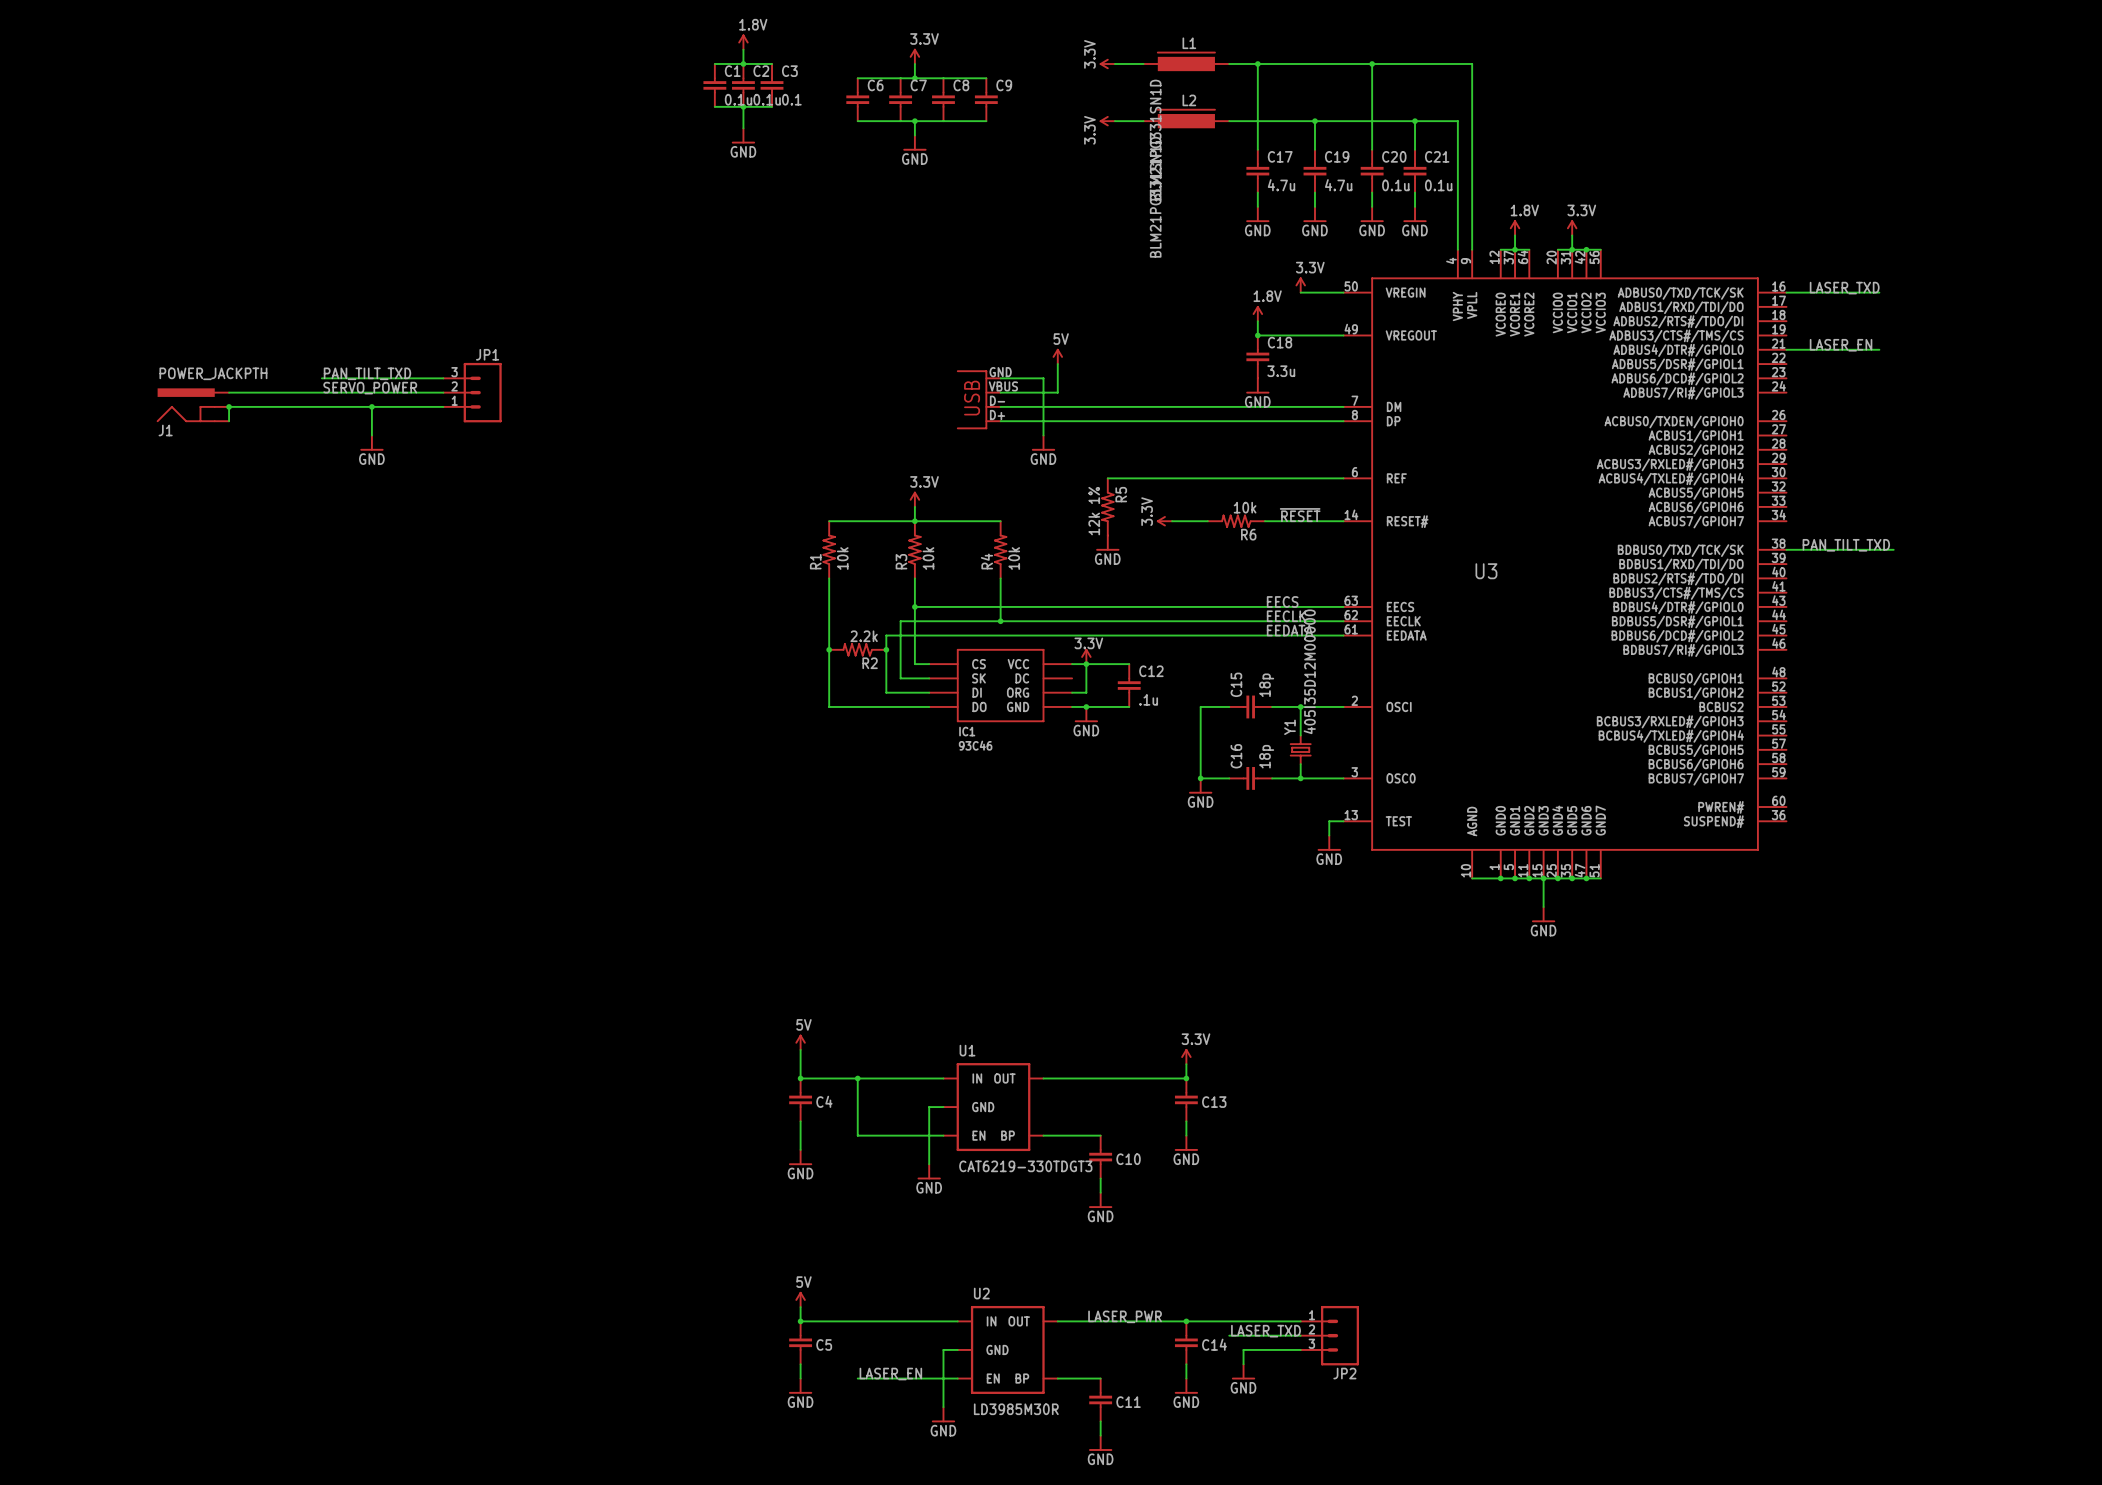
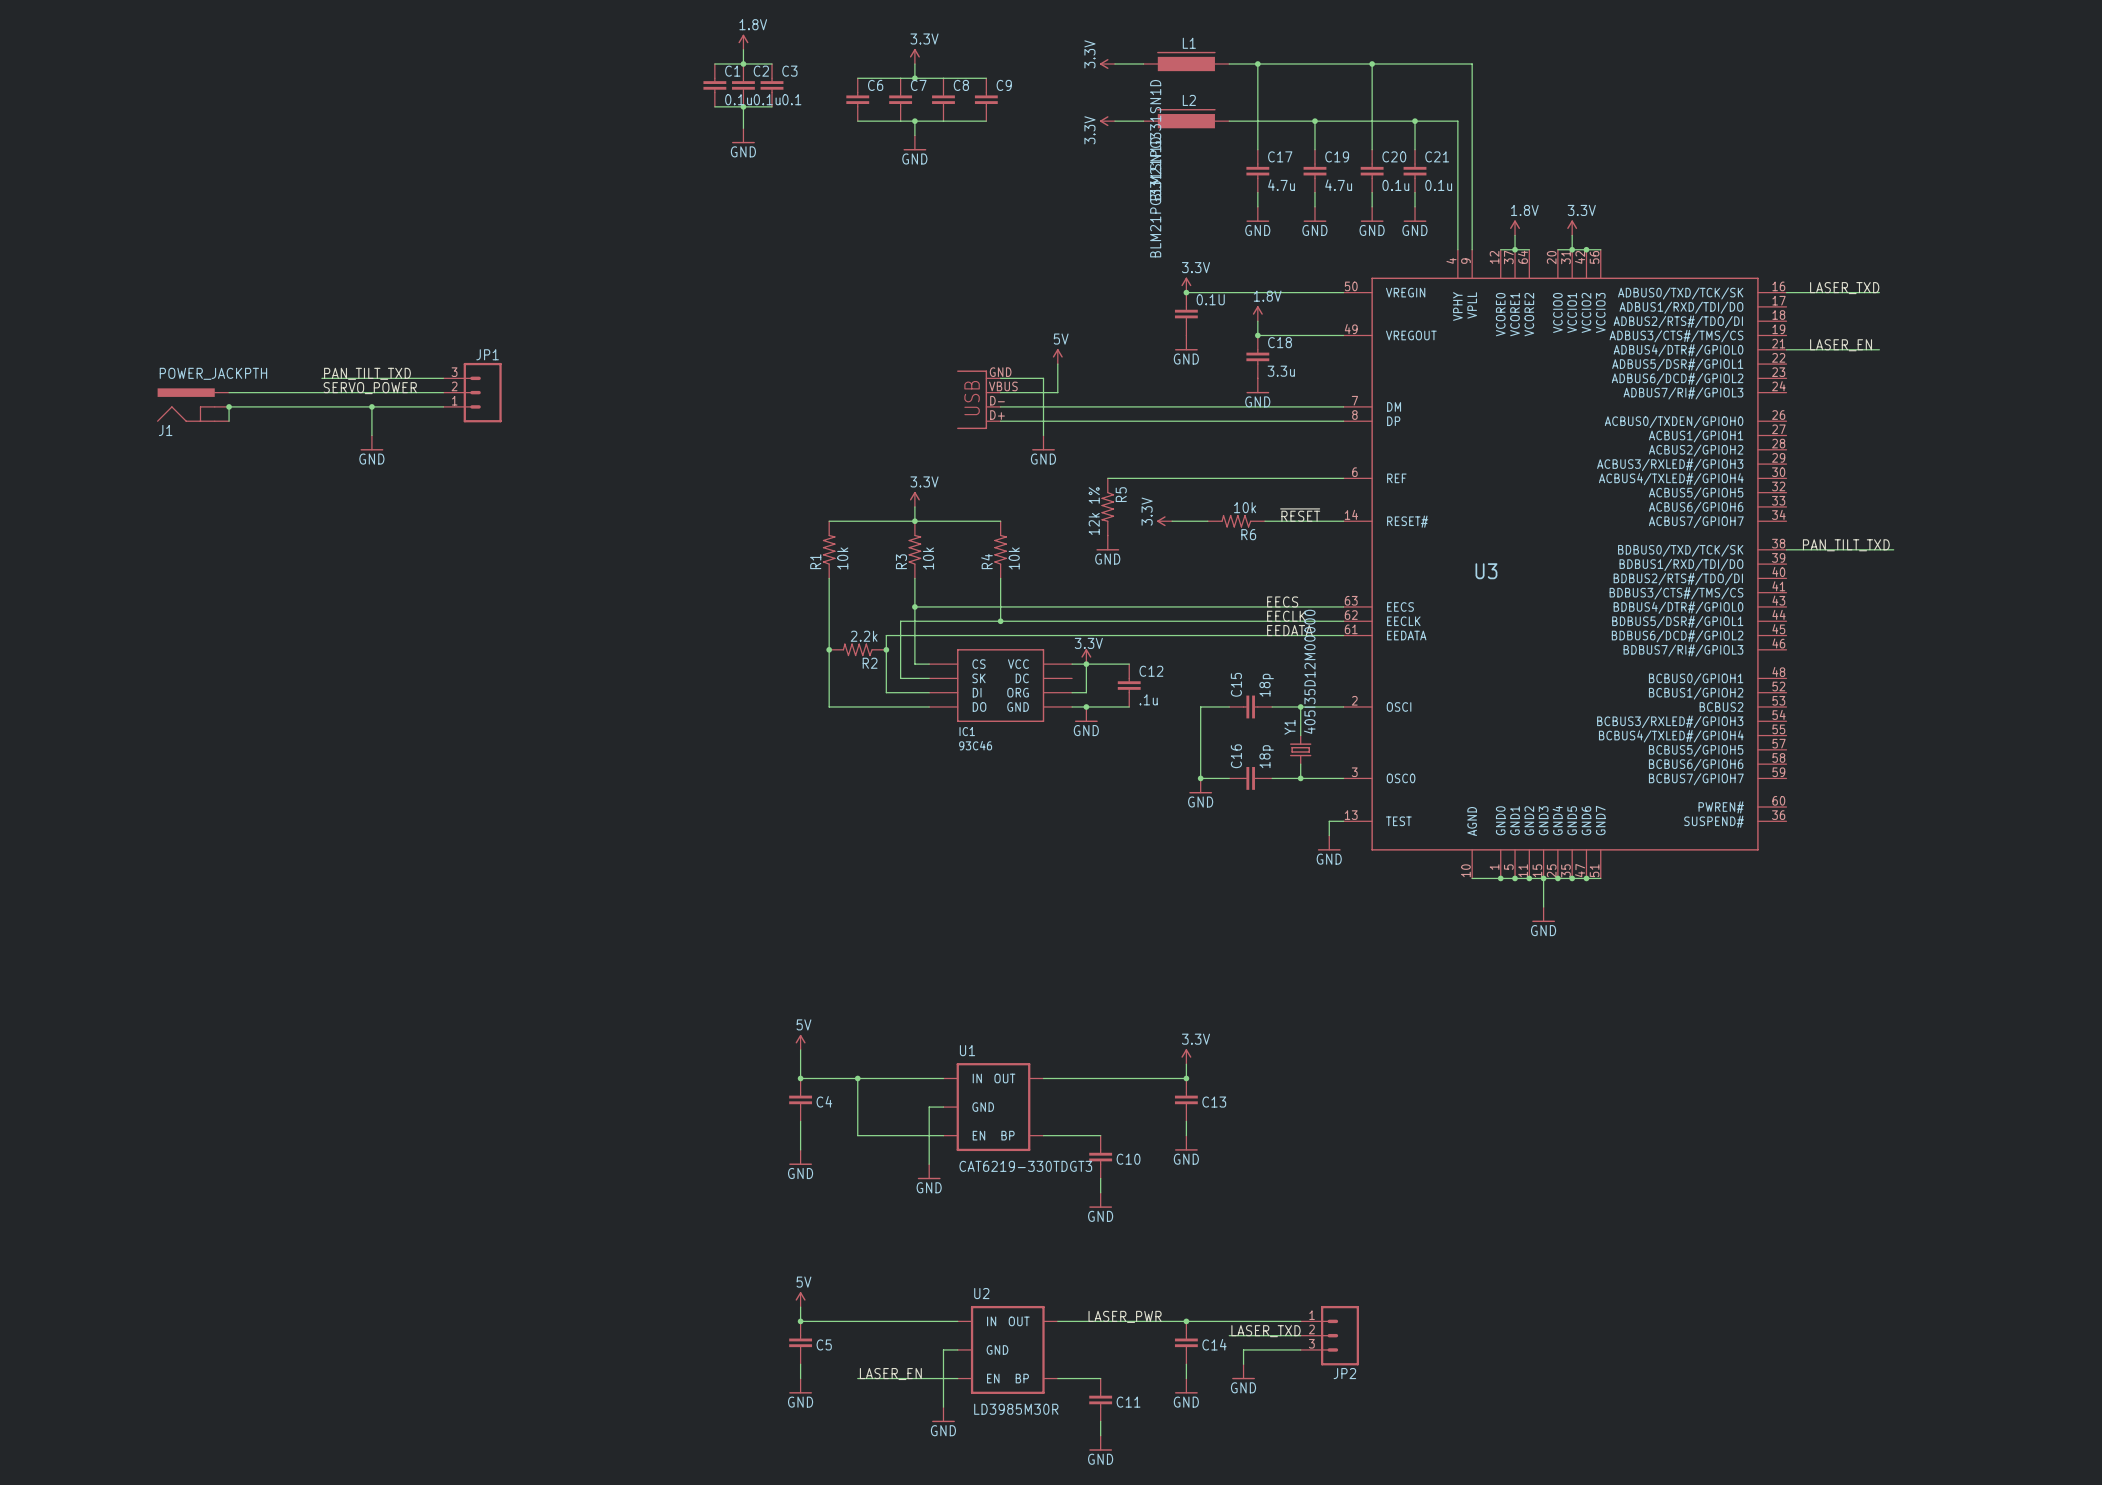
power symbol position: 3.3V (1300, 285) -> 3.3V (1186, 285)
wire: none -> (1186, 292) (1300, 292)
junction: none -> (1186, 292)
0.1U: none -> (1186, 314)
power symbol: none -> GND (1186, 342)

